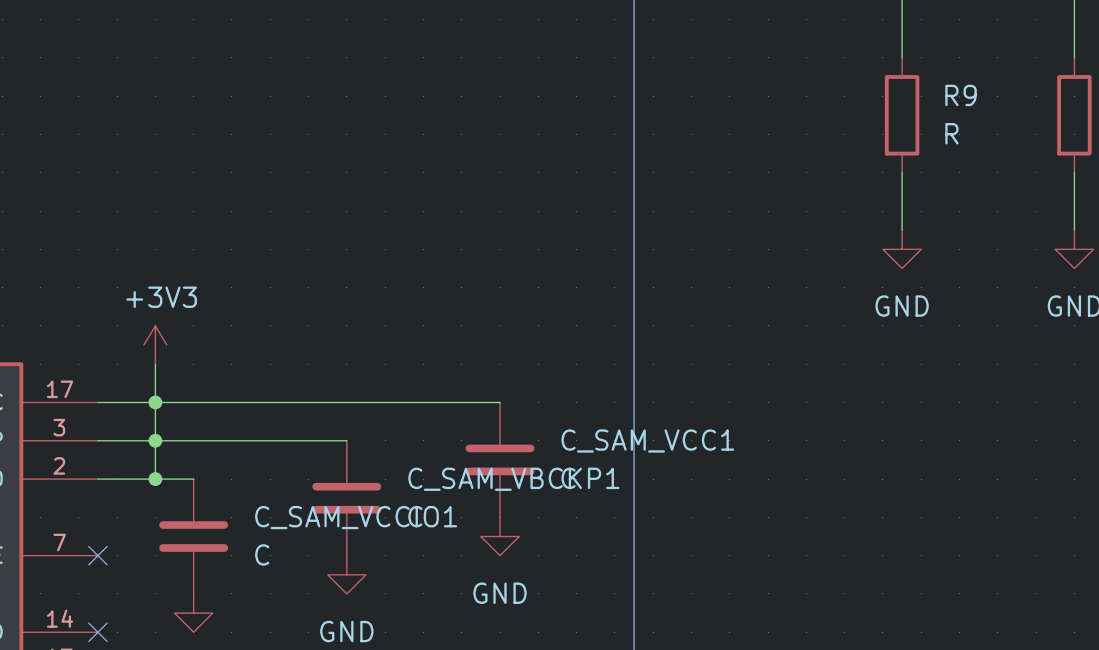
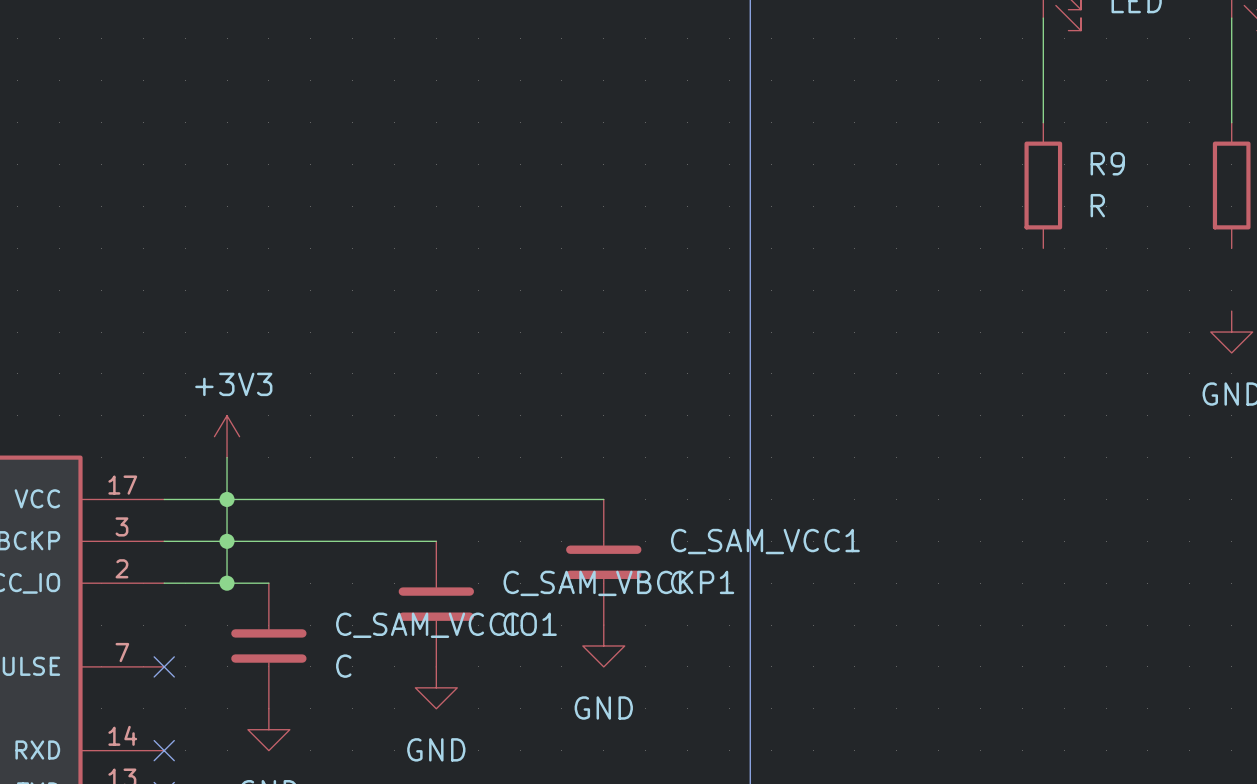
wire: (902, 172) (902, 230) -> none
wire: (1074, 172) (1074, 230) -> none
power symbol: GND (902, 249) -> none

